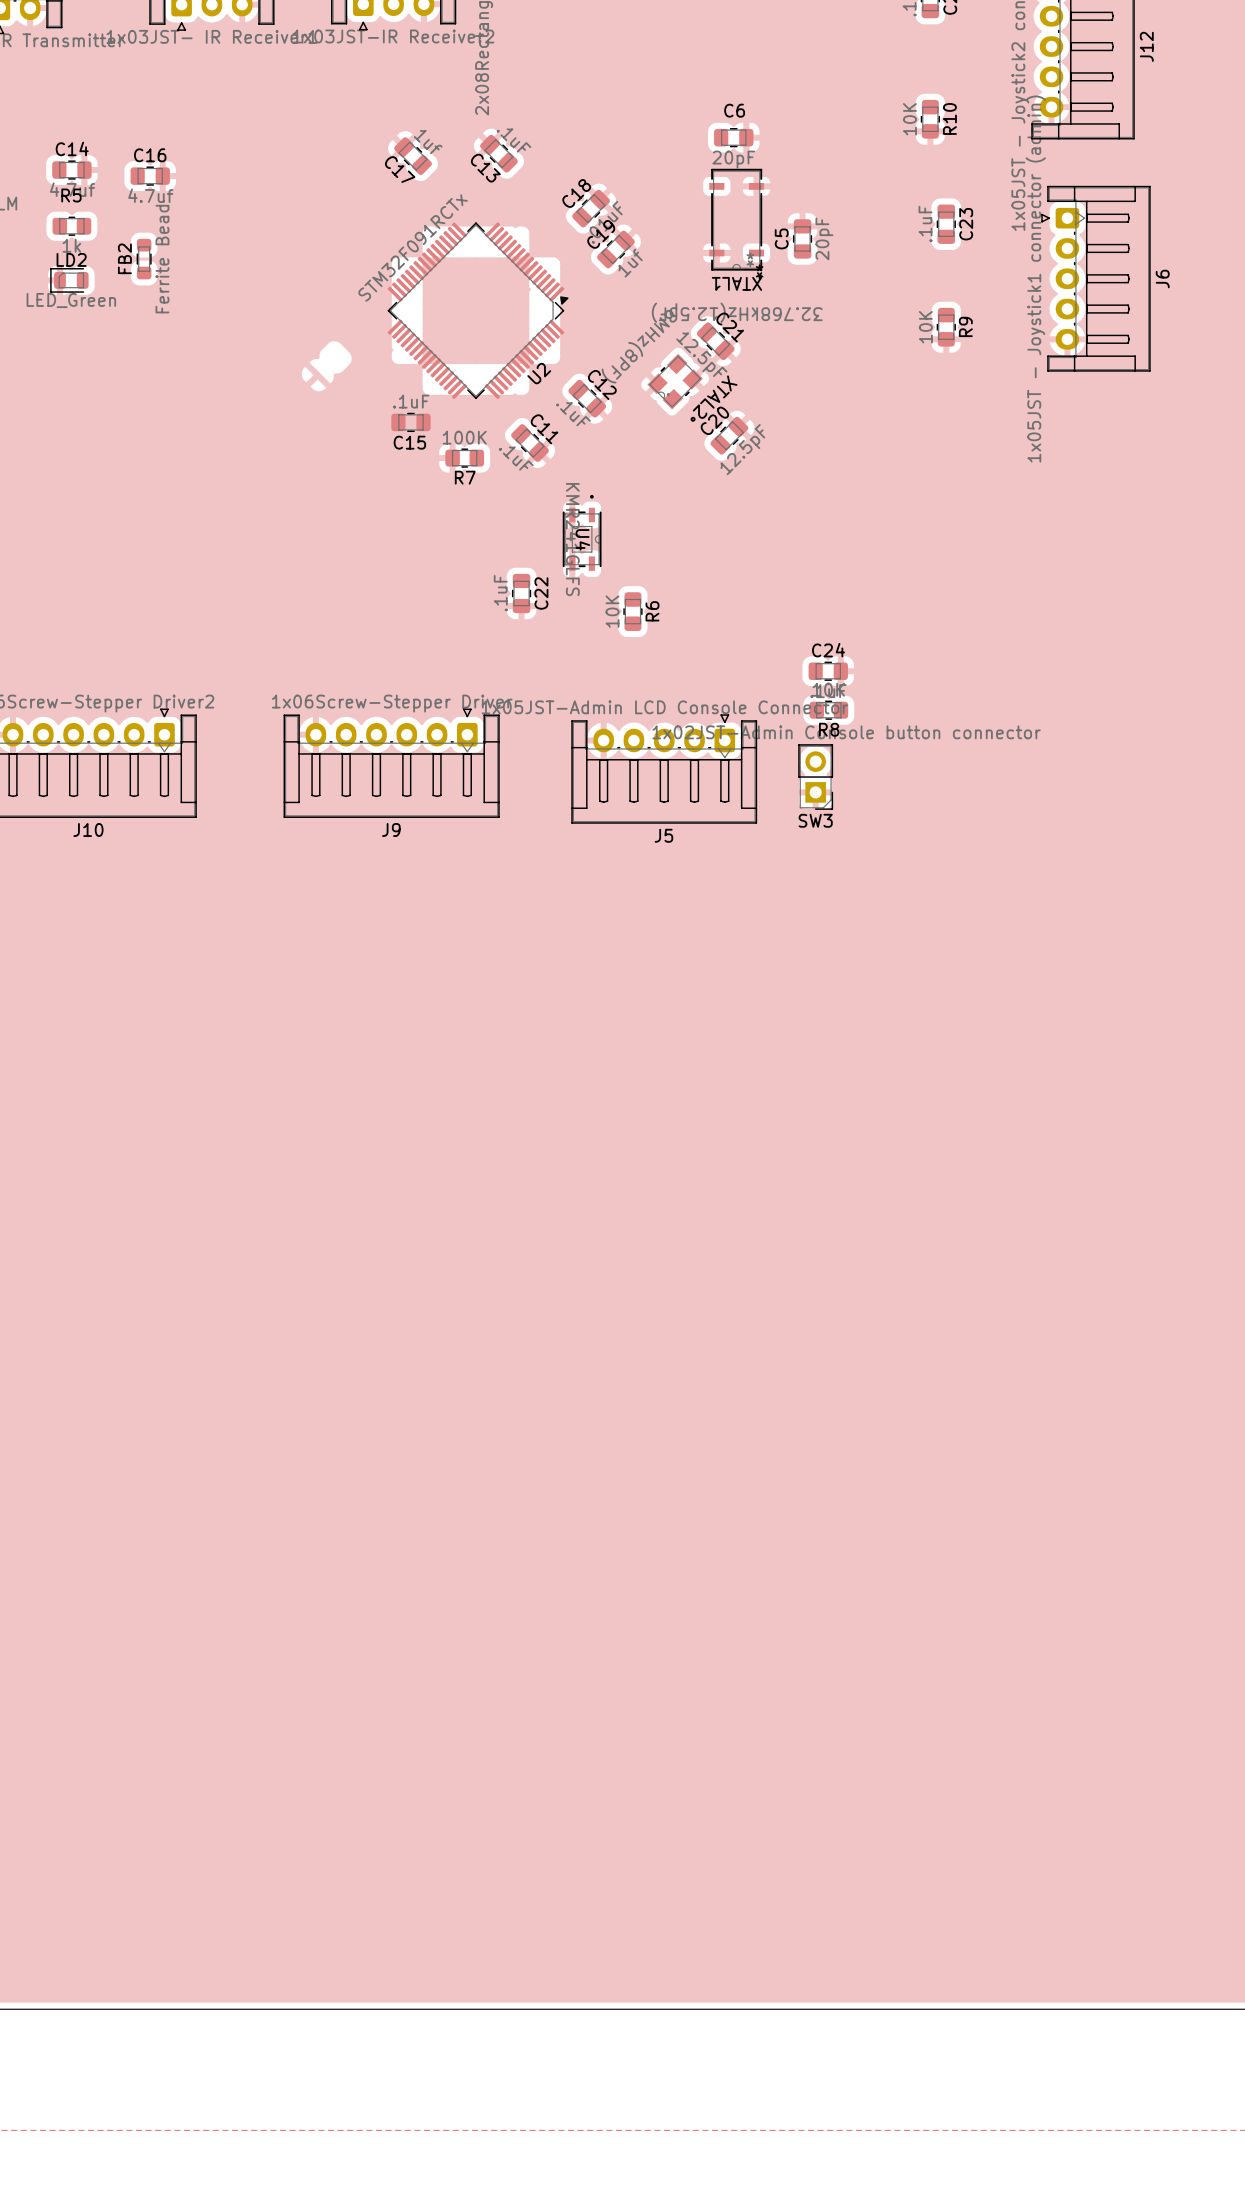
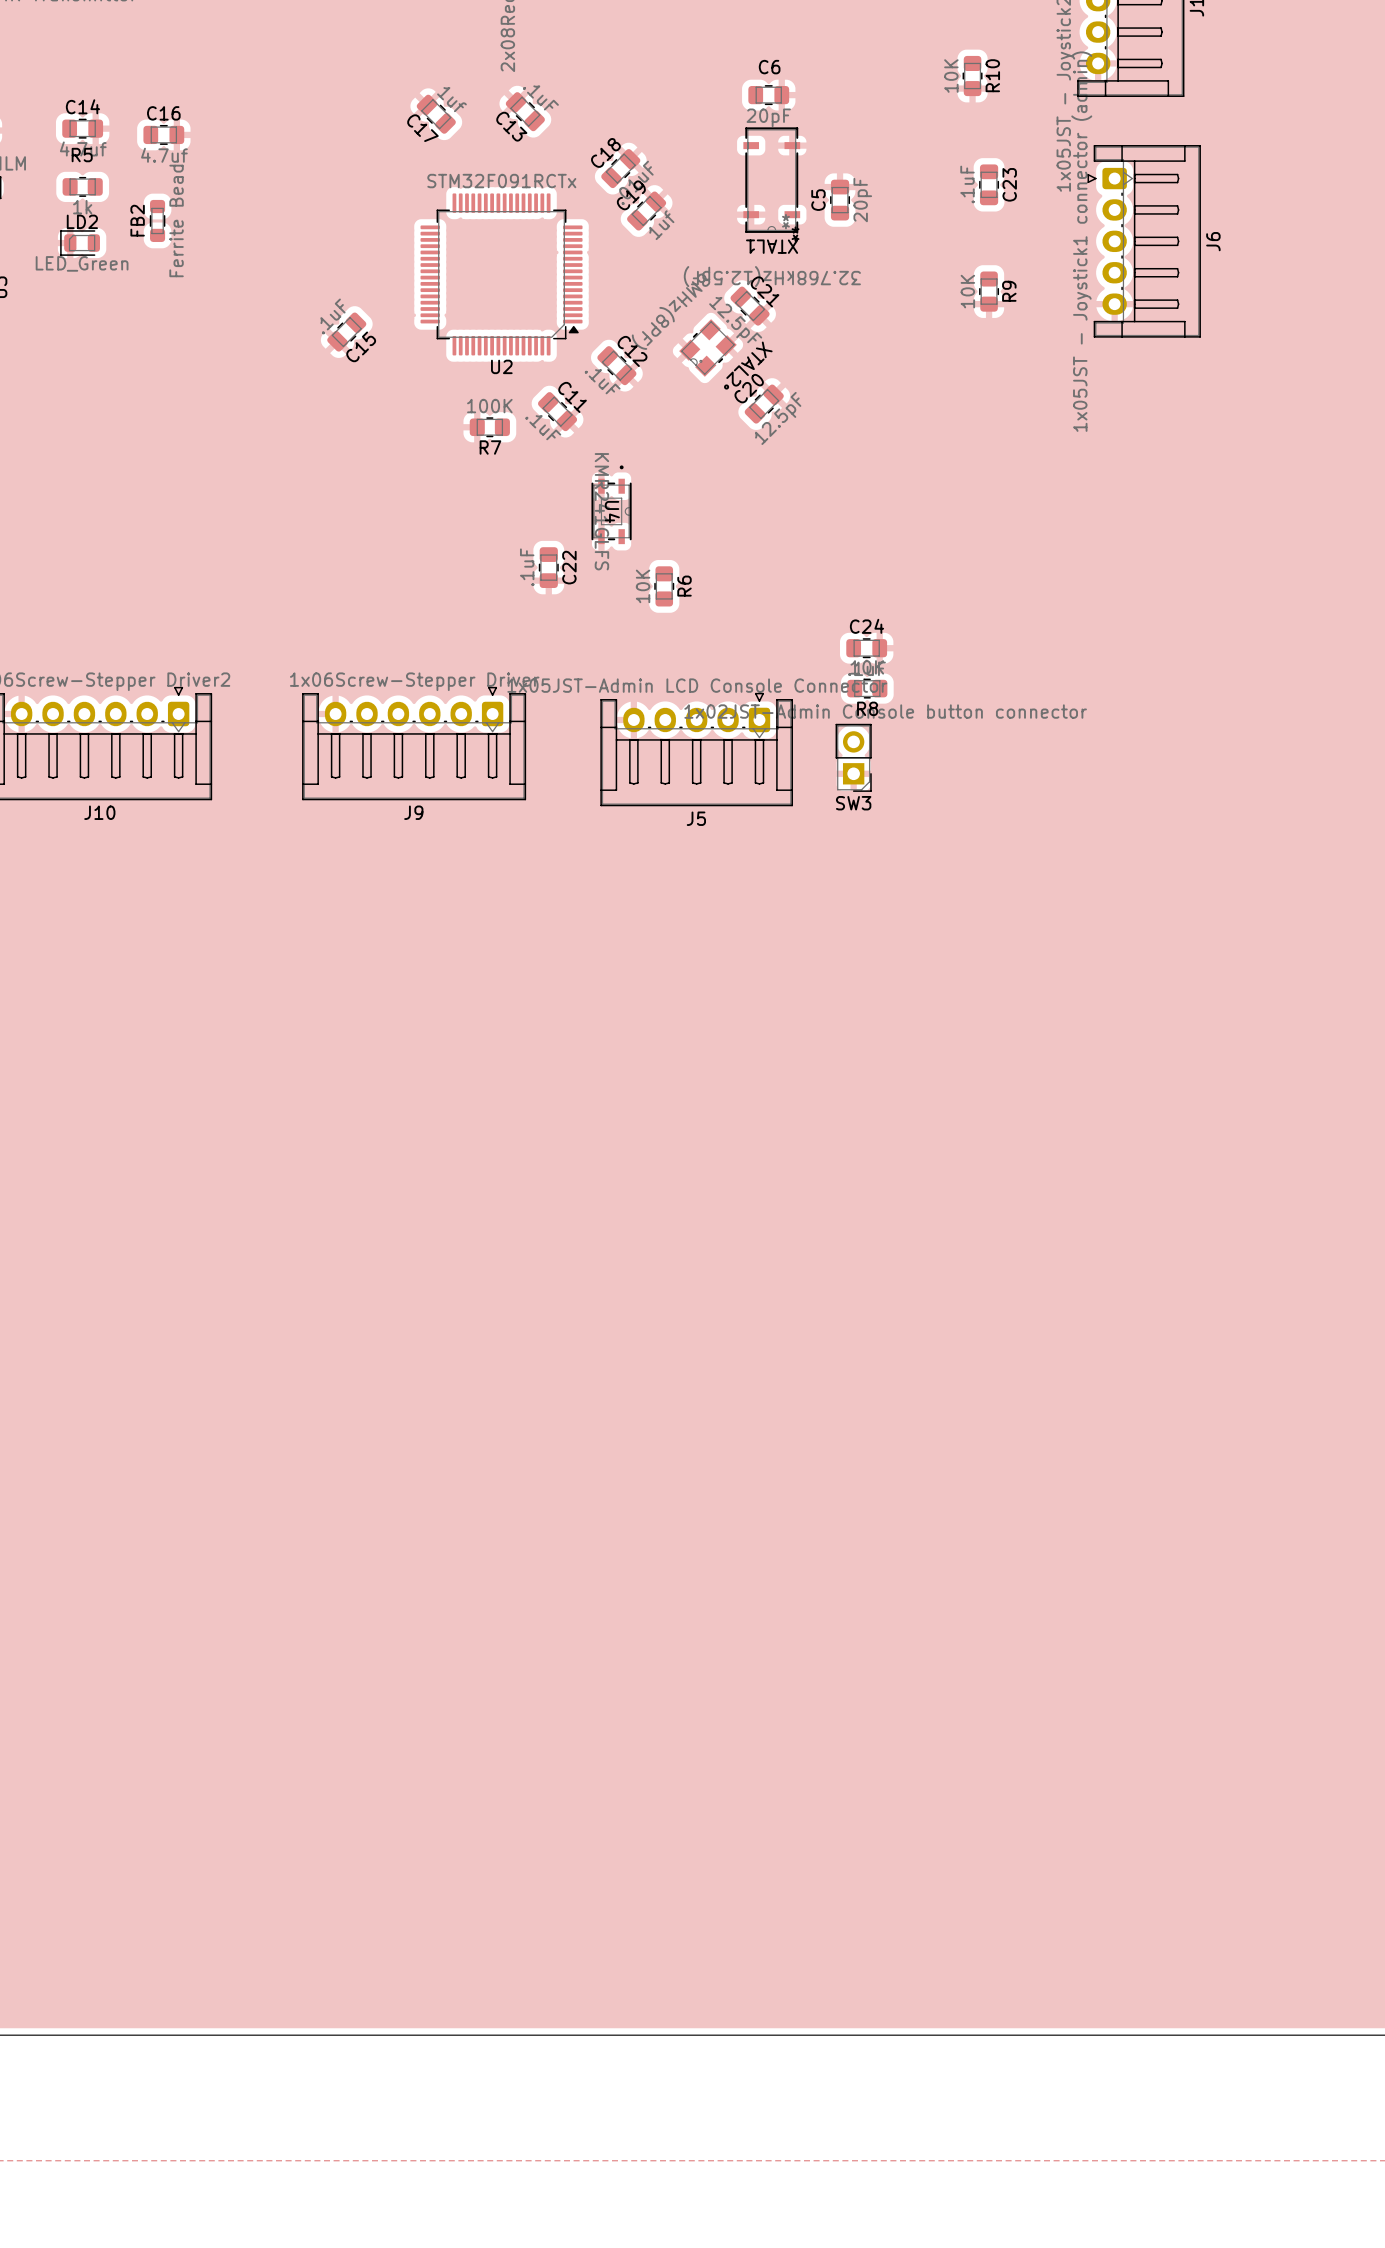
U2 rotation: 0° (478, 310) -> 45° clockwise (501, 274)
C15 rotation: 0° (410, 422) -> 45° counterclockwise (346, 332)
C15 position: (410, 422) -> (346, 332)

